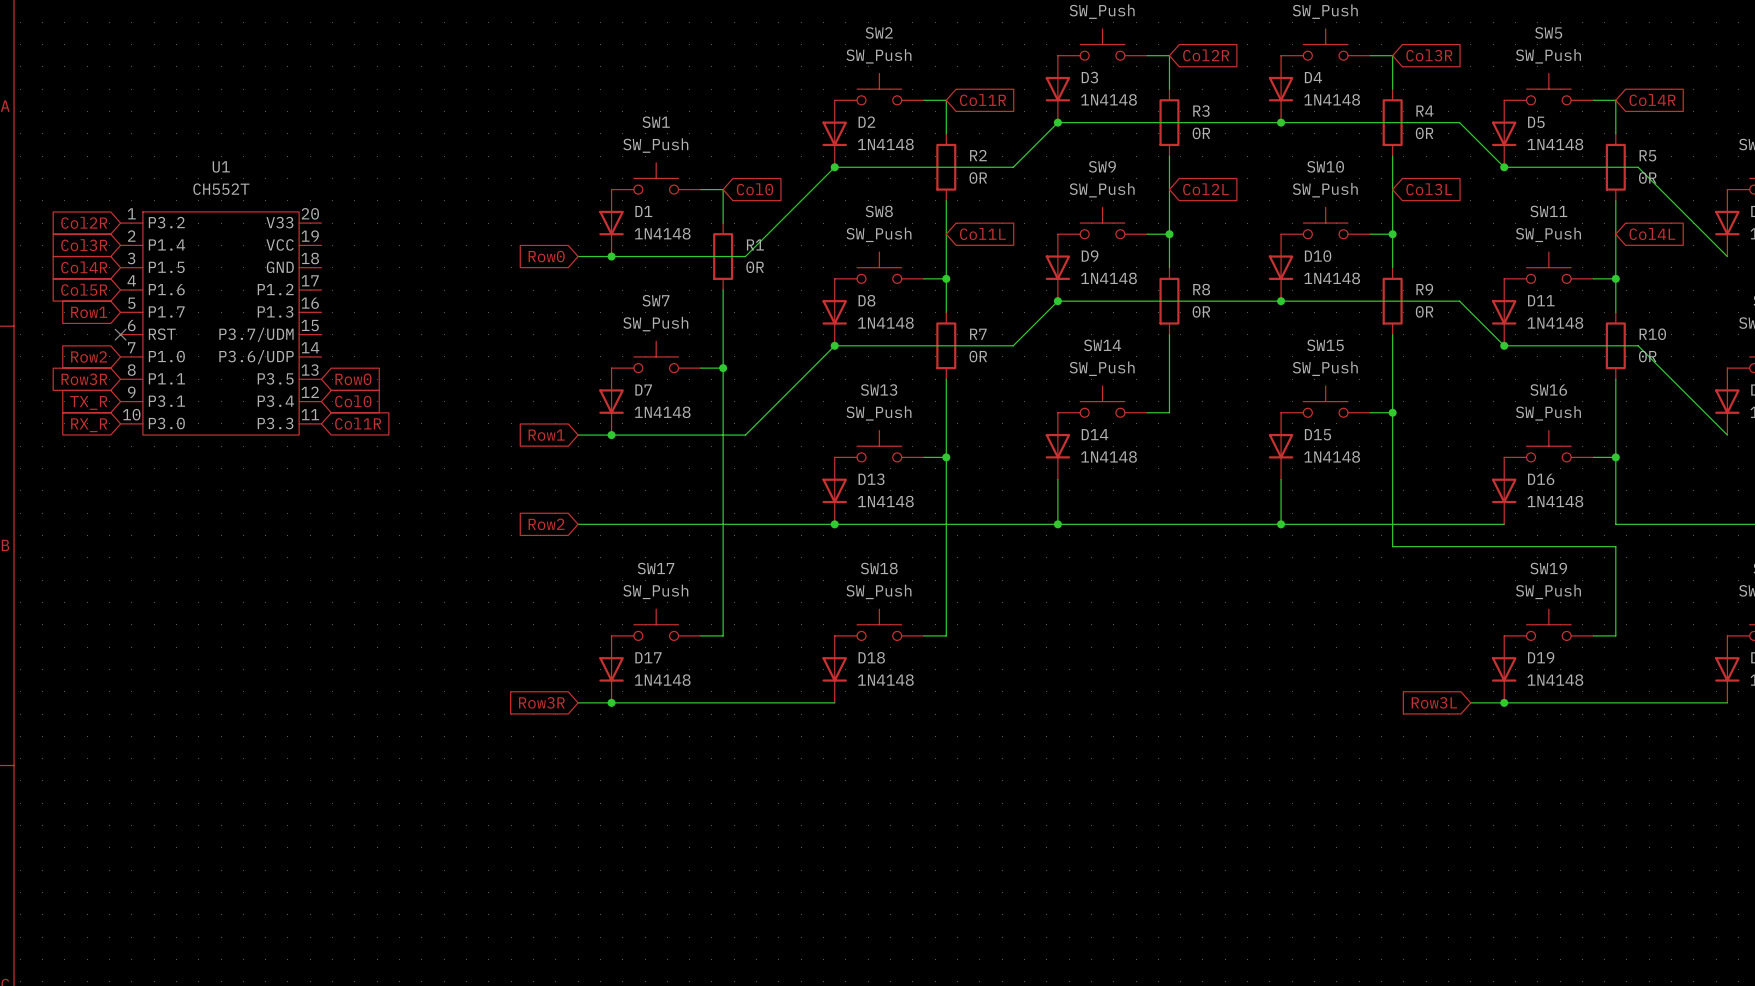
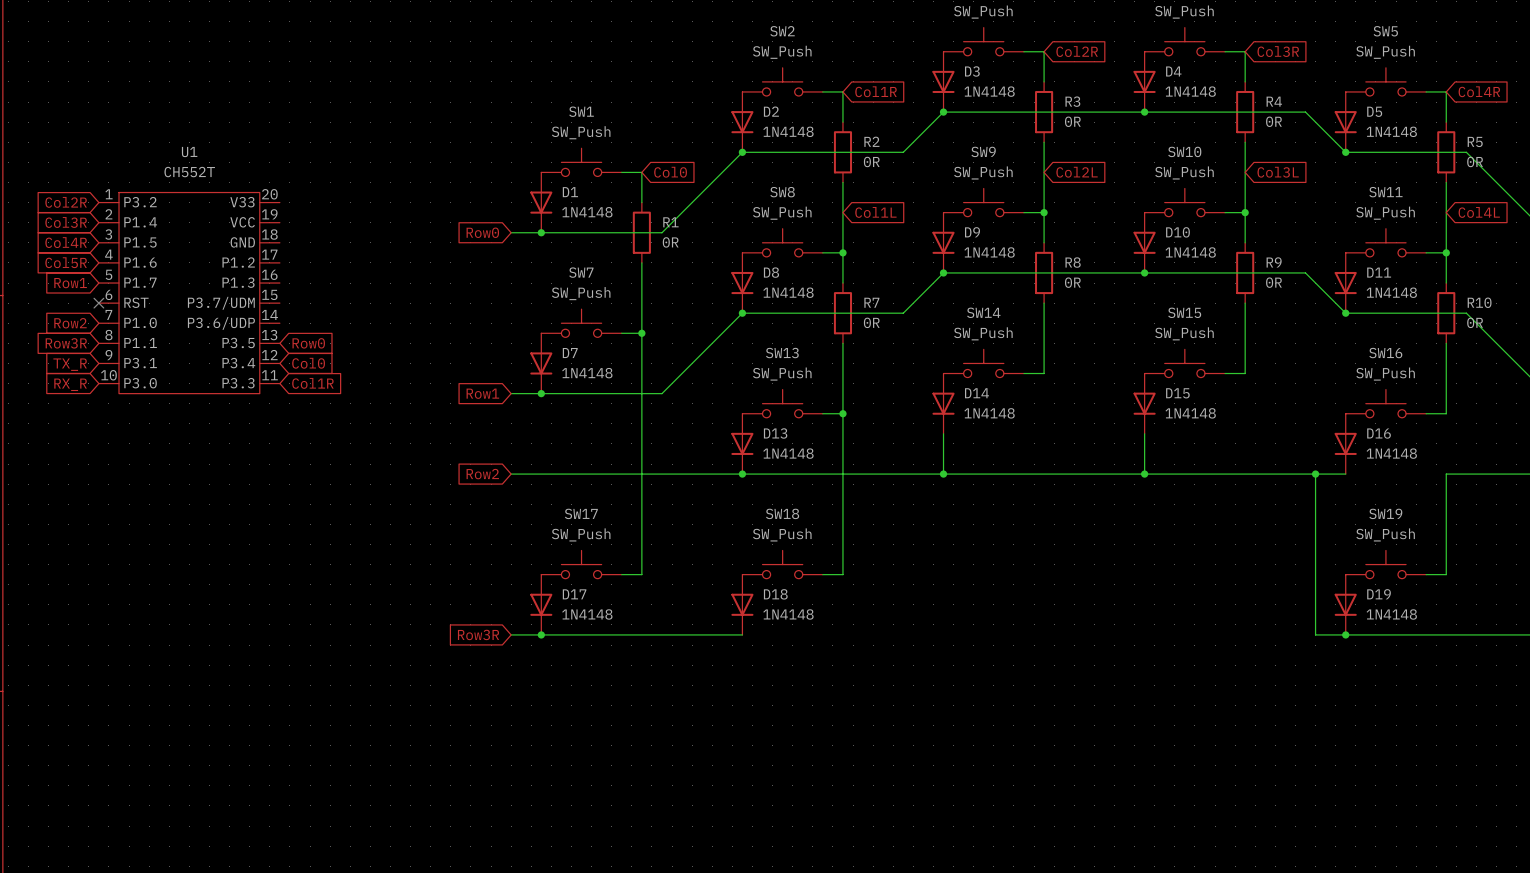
wire: (1392, 412) (1392, 546) (1615, 546) -> none
junction: (1392, 412) -> none
wire: (1615, 457) (1615, 524) -> (1446, 494) (1446, 474)
junction: (1615, 457) -> none
wire: none -> (1315, 474) (1315, 634)
junction: none -> (1315, 474)
global label: Row3L (1434, 702) -> none

